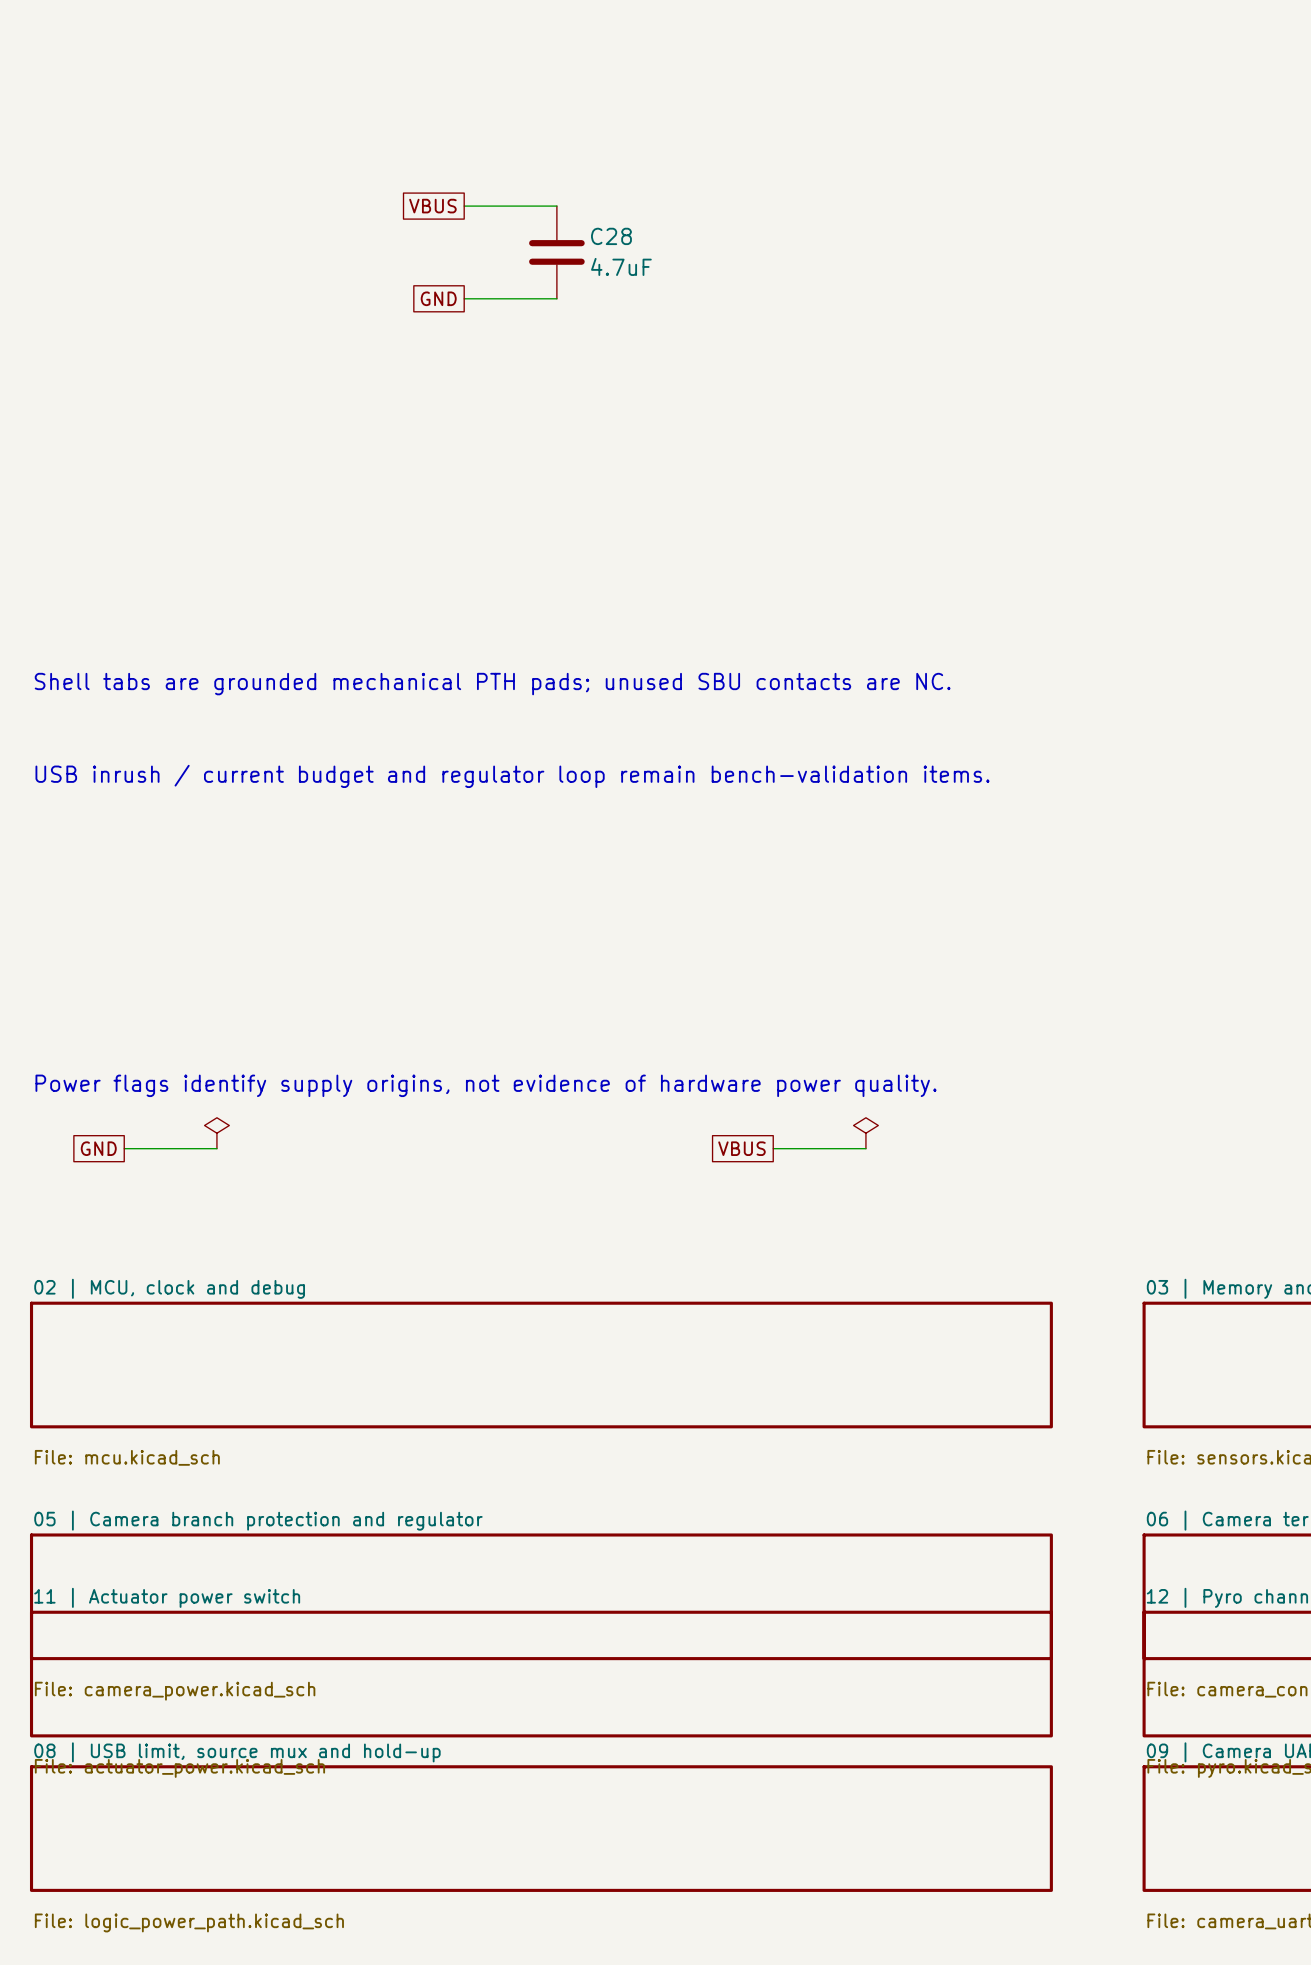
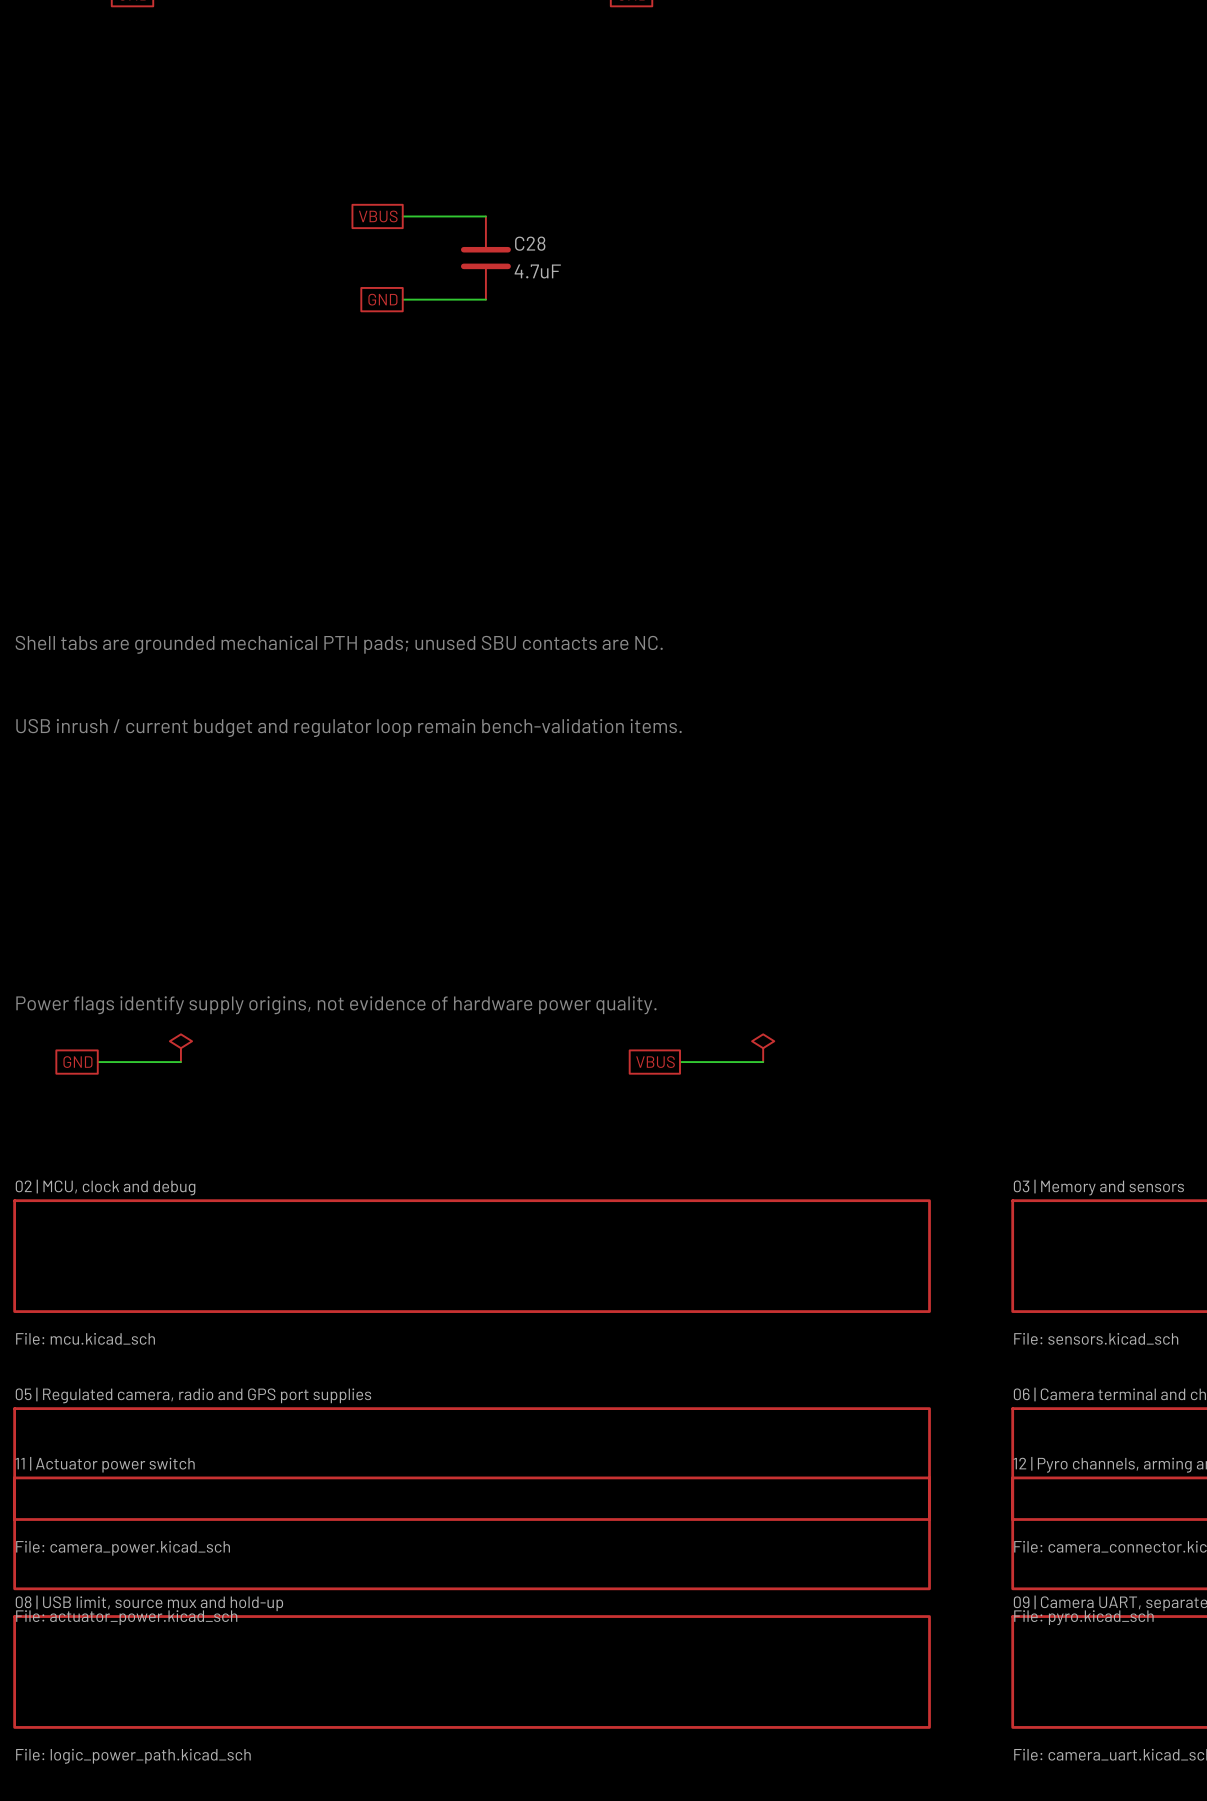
sheet 05 | Camera branch protection and regulator name: 05 | Camera branch protection and regulator (258, 1520) -> 05 | Regulated camera, radio and GPS port supplies (193, 1395)

